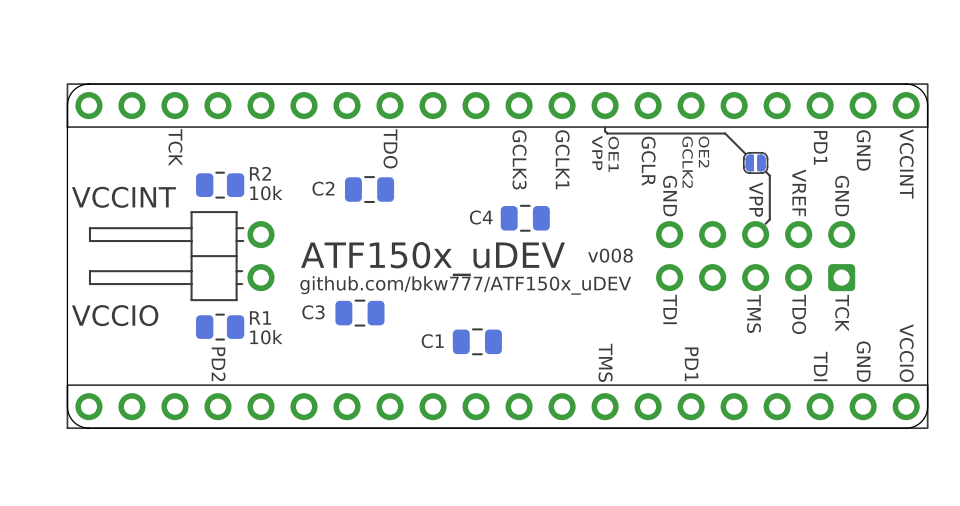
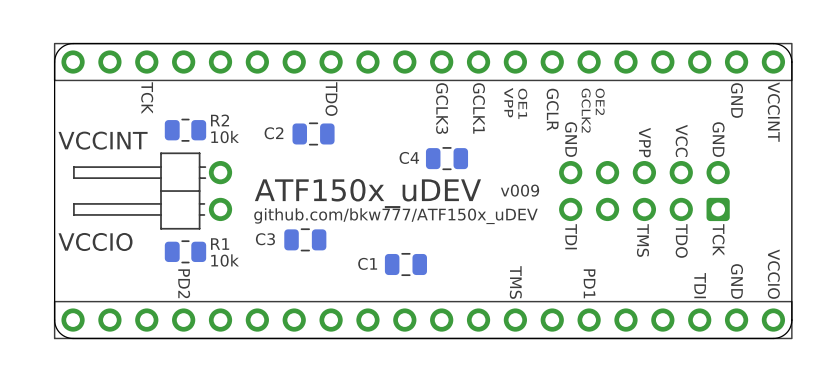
line: (605, 127) (607, 133) (725, 133) (745, 153) -> none
text: PD1 (820, 147) -> none
part: (755, 162) -> none
line: (765, 171) (769, 175) (769, 219) (765, 223) -> none
text: VREF (799, 192) -> VCC (681, 140)
text: v008 (610, 255) -> v009 (520, 190)

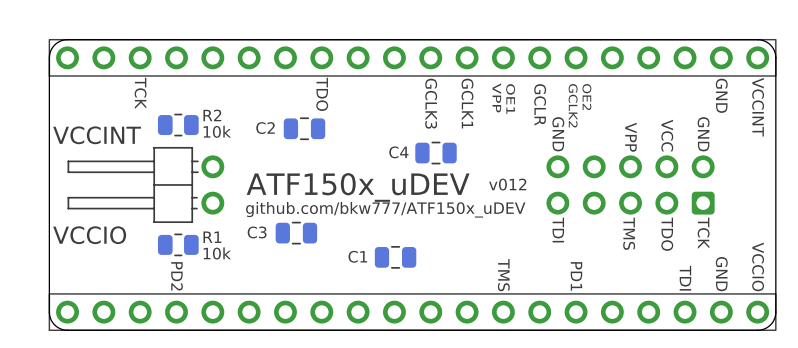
text: v009 (520, 190) -> v012 (507, 184)

